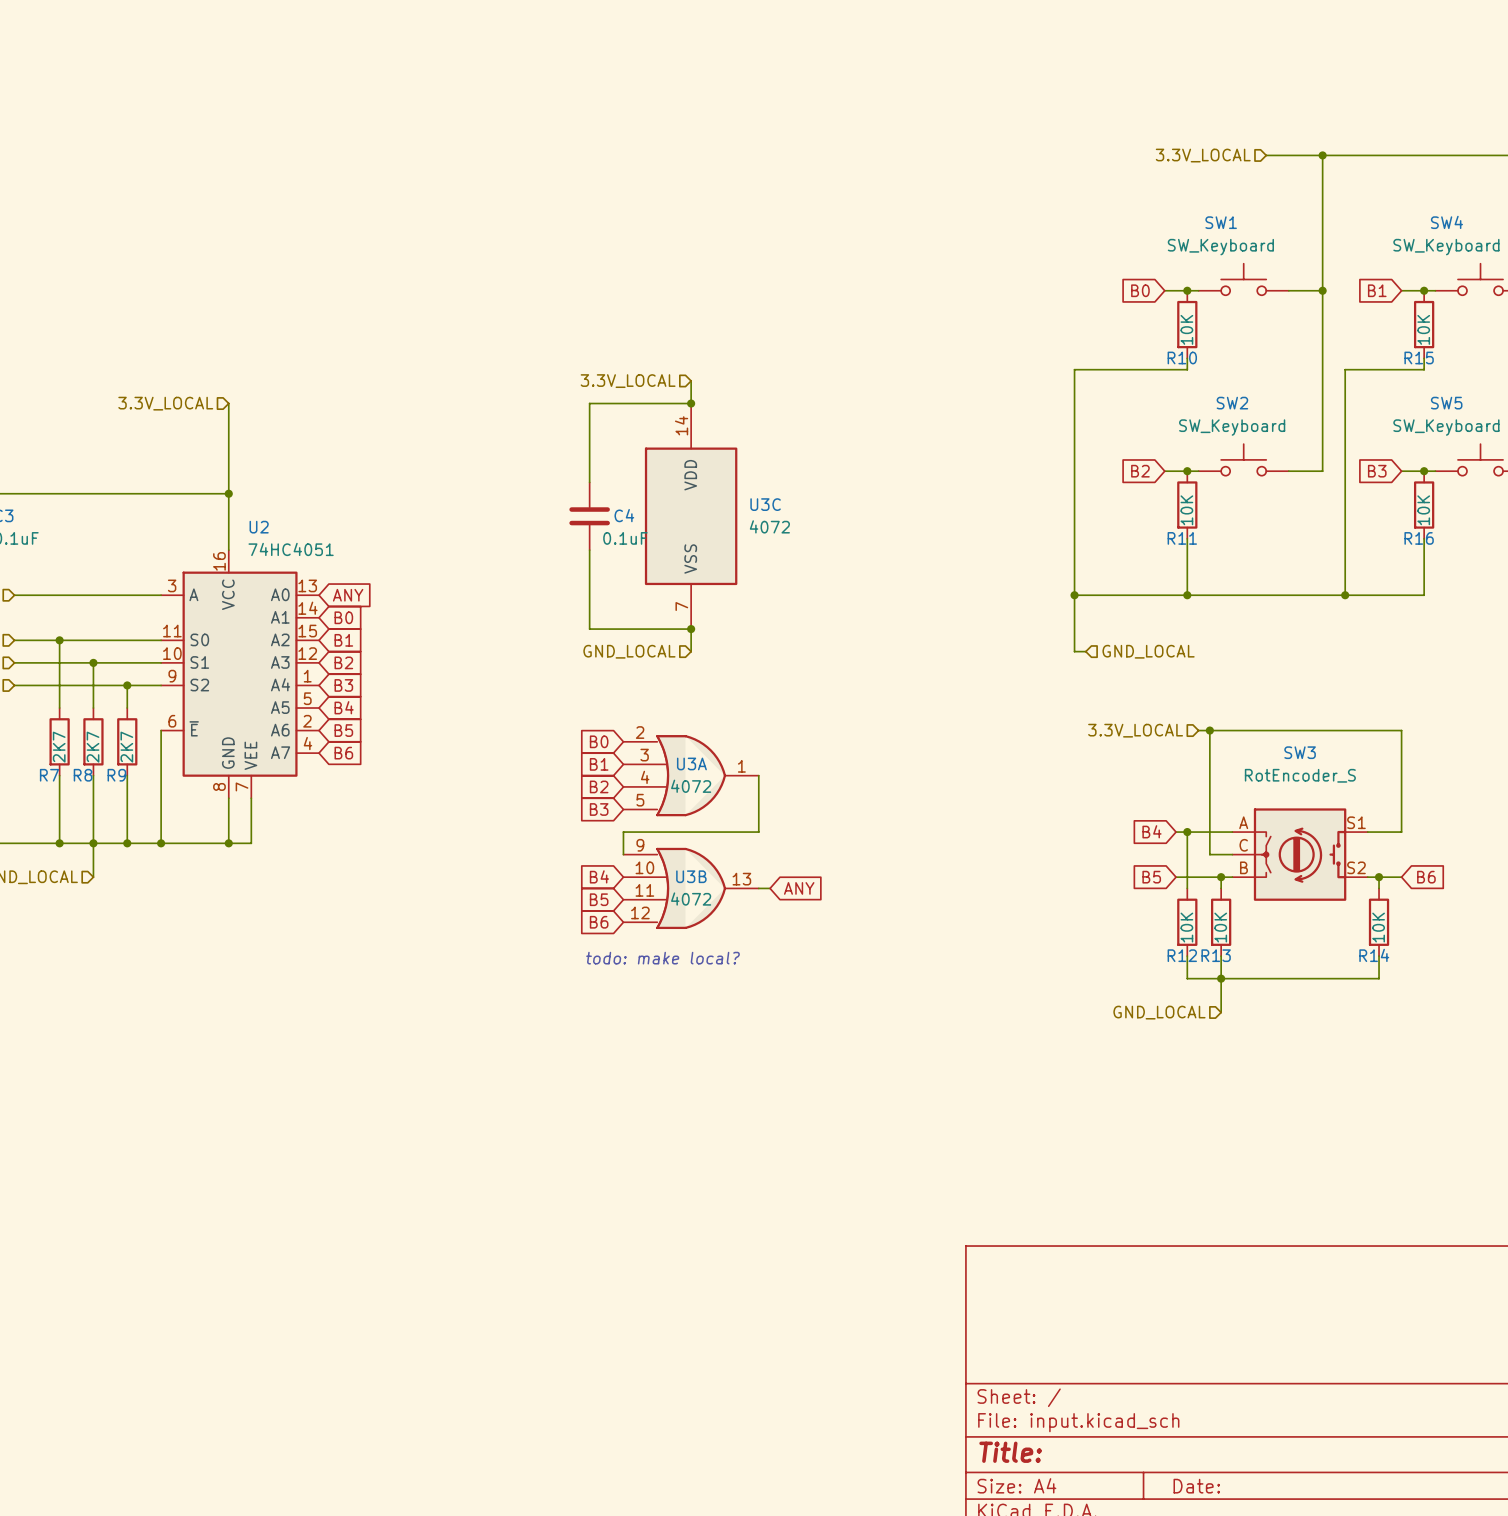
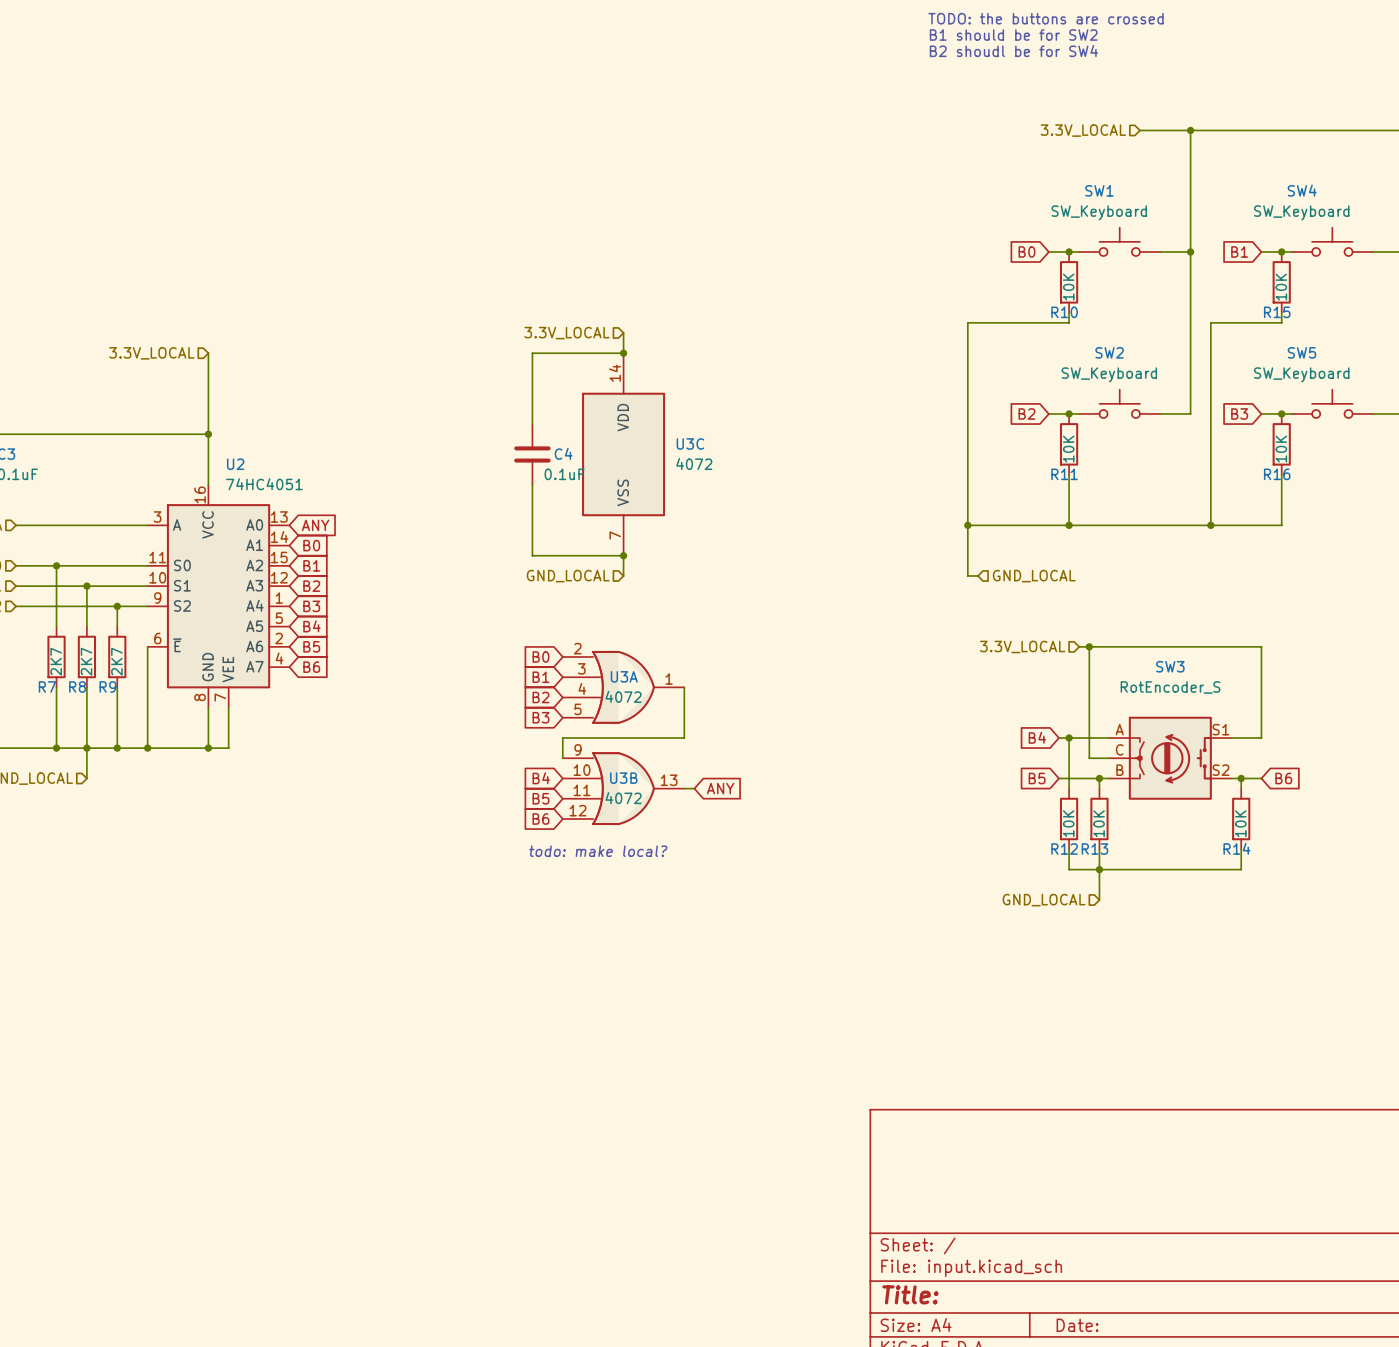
text: none -> TODO: the buttons are crossed (1046, 18)
text: none -> B1 should be for SW2 (1013, 34)
text: none -> B2 shoudl be for SW4 (1013, 51)

